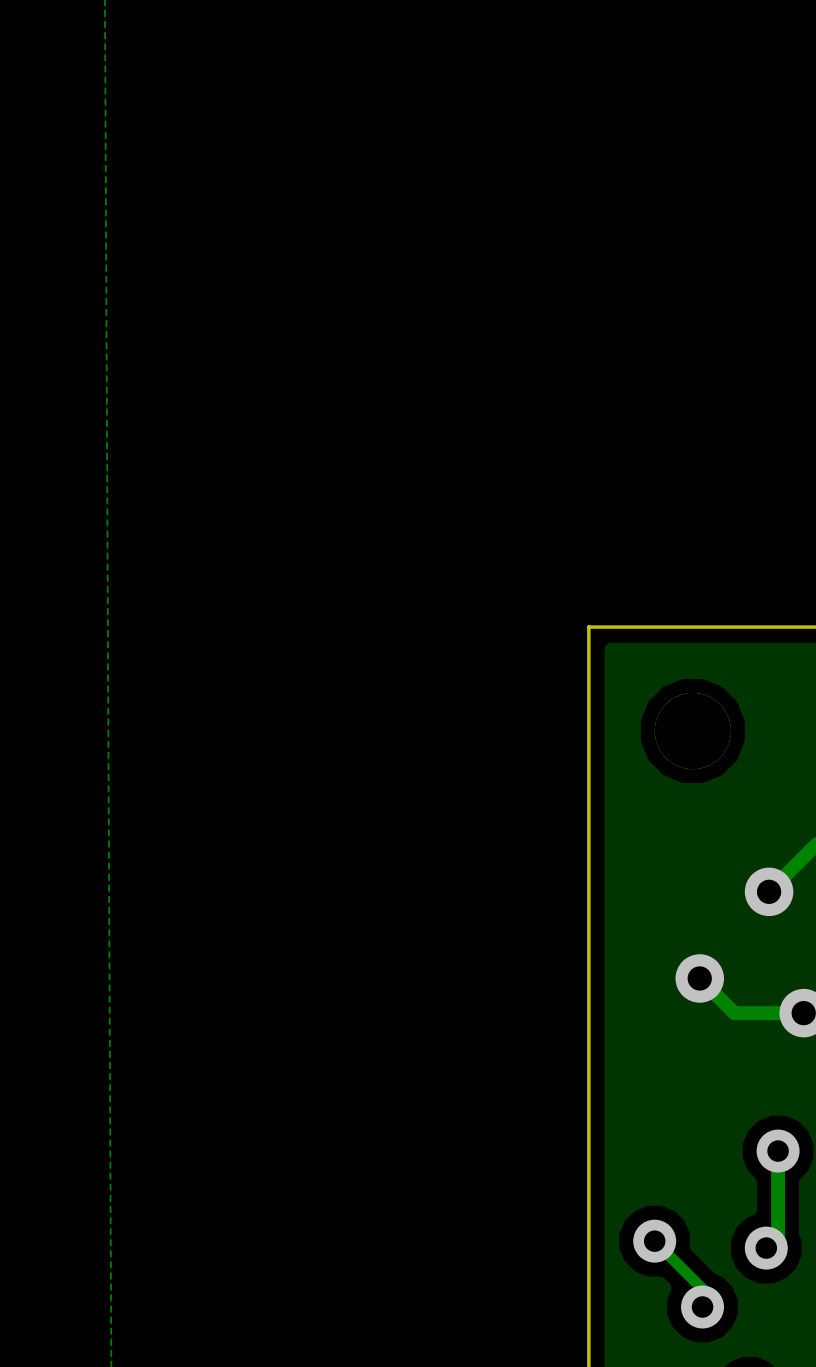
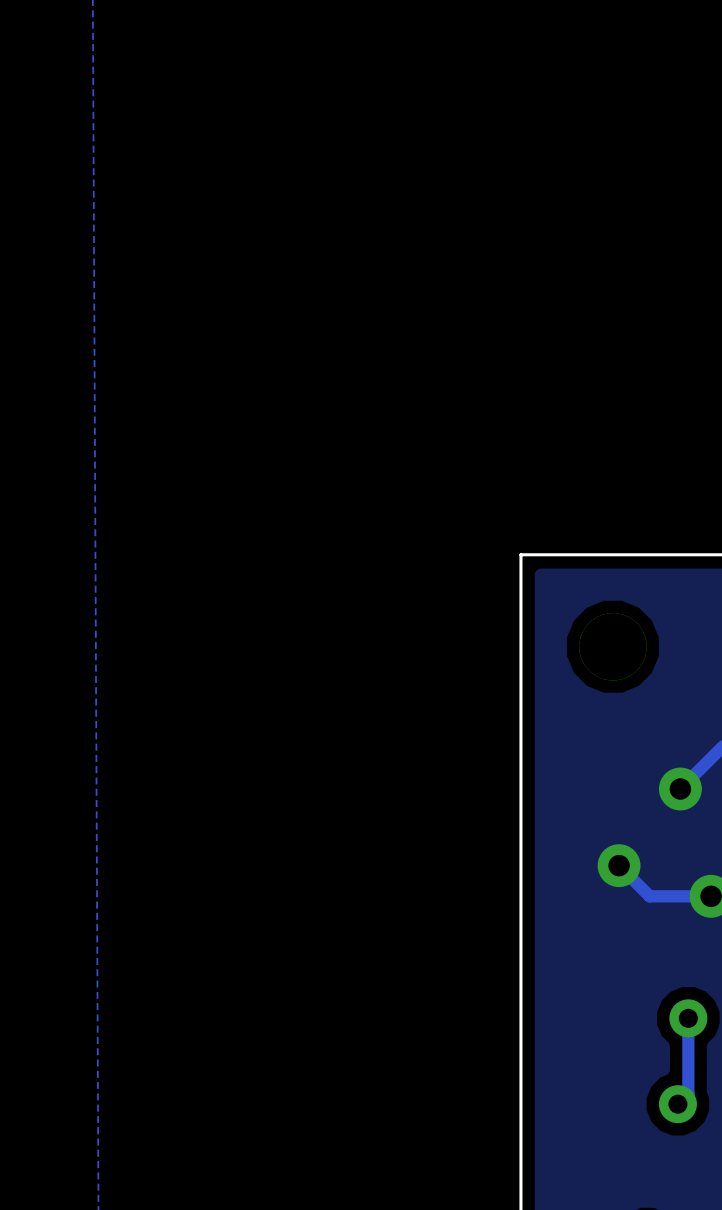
track: (654, 1241) (702, 1288) (702, 1307) -> none
via: (654, 1241) -> none
via: (702, 1307) -> none

